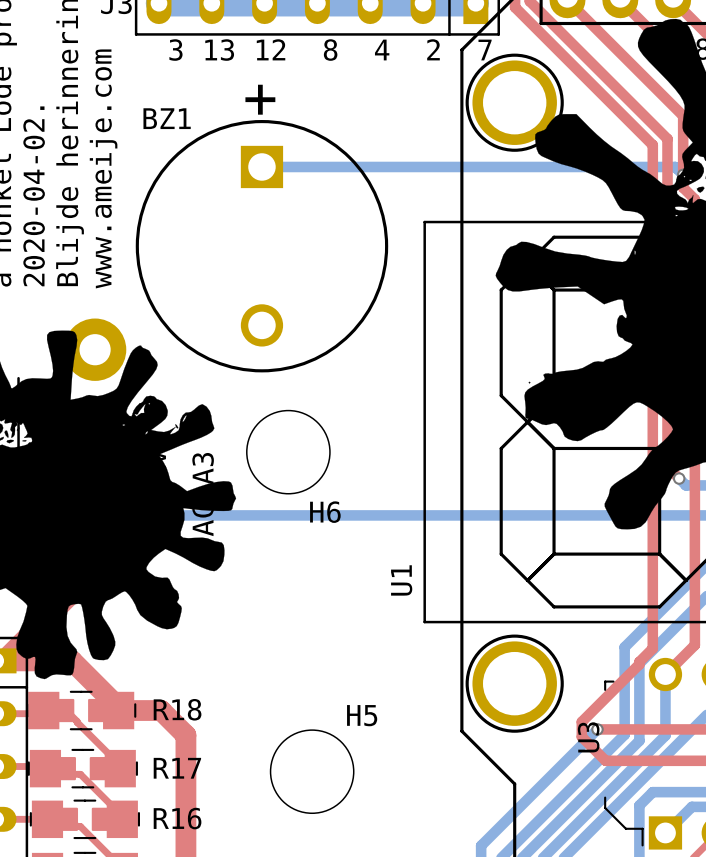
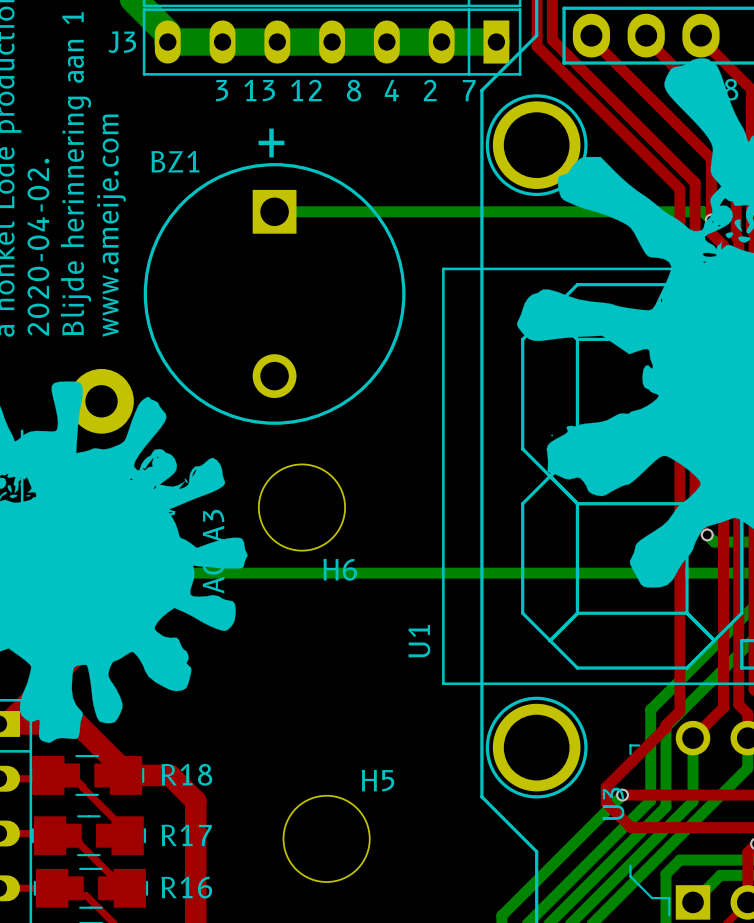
top track: none -> (77, 841) (120, 885)
top track: (73, 774) (80, 774) (122, 816) -> none

